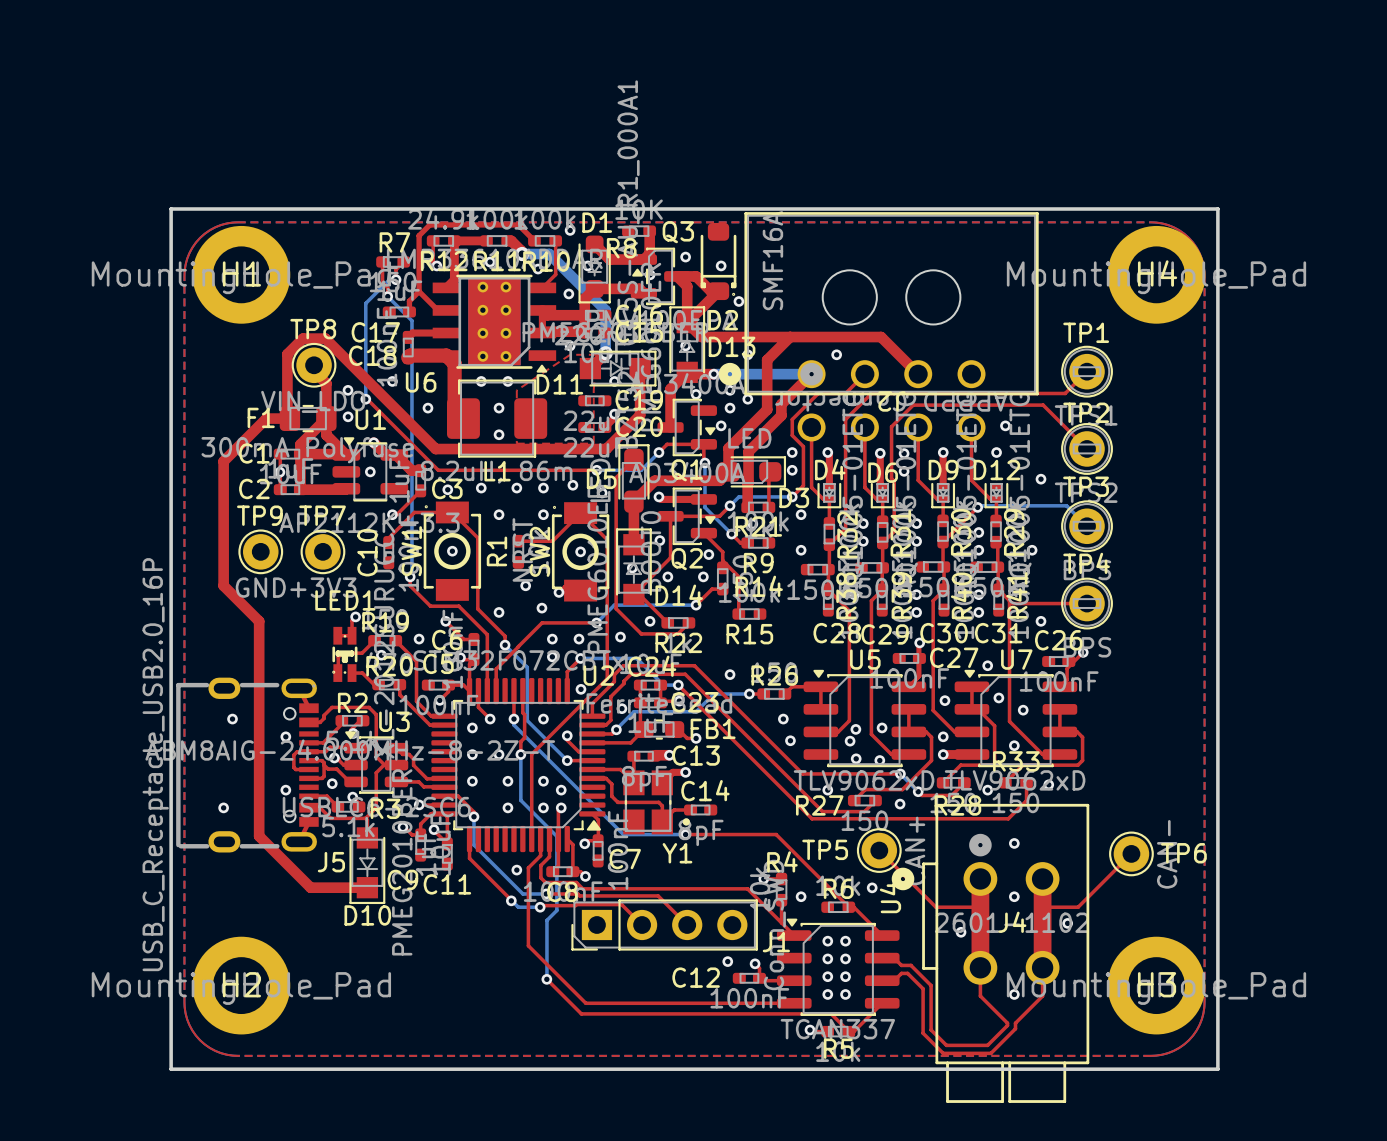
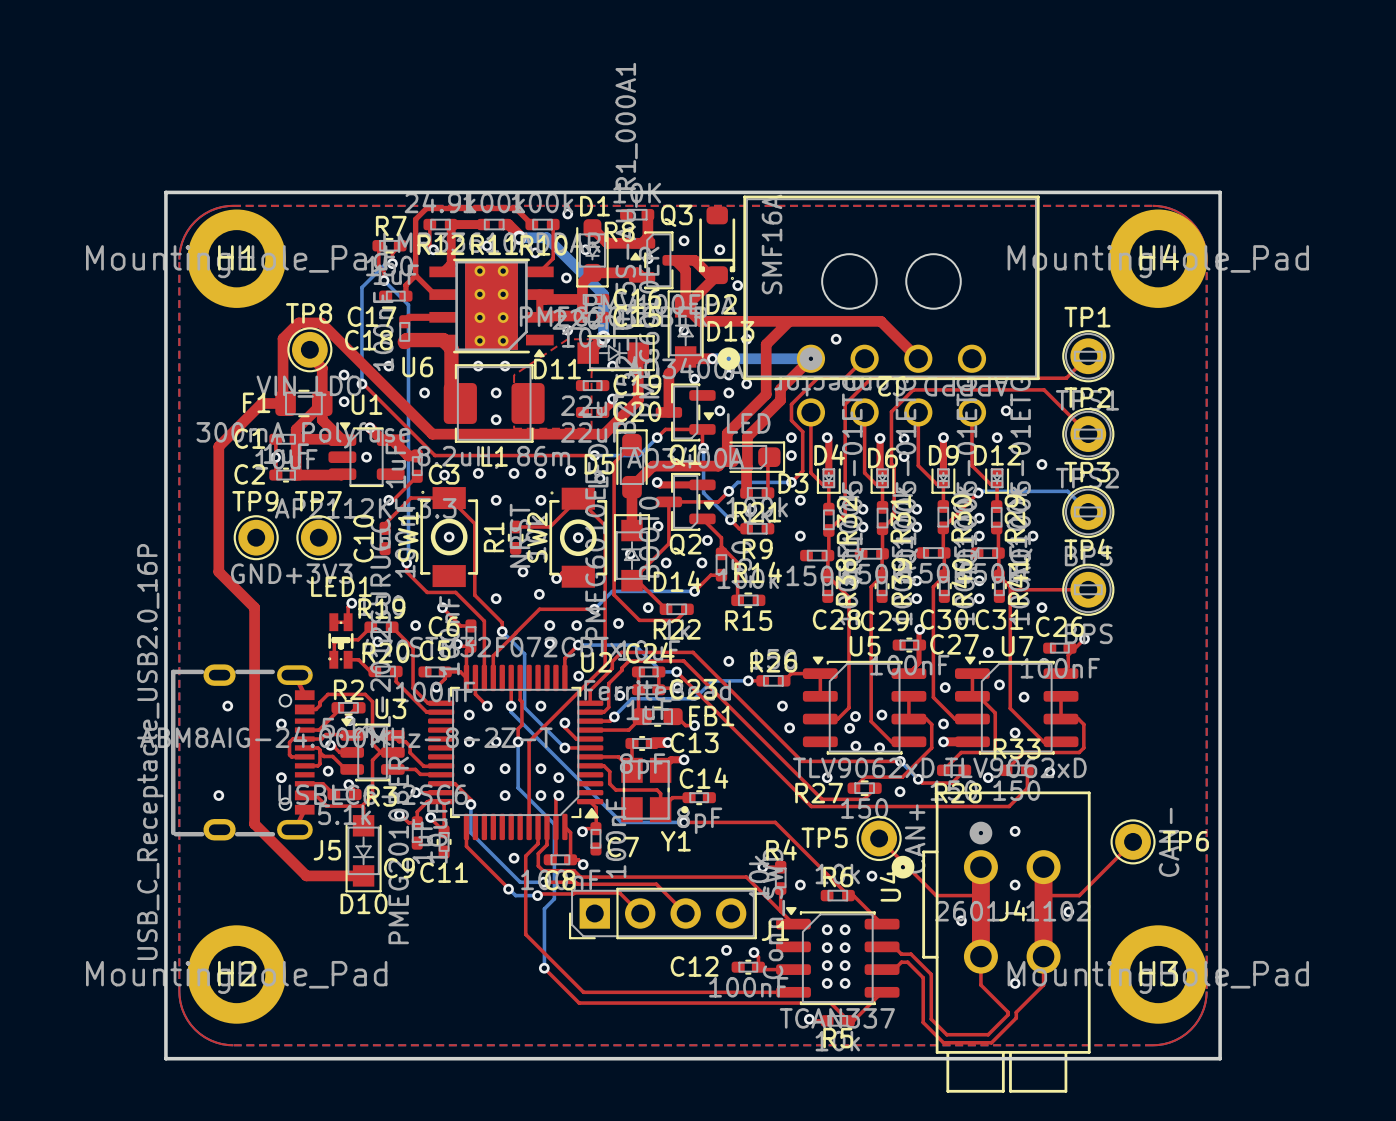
R7 footprint: [376, 256, 411, 268] -> [372, 237, 407, 254]
C2 footprint: [273, 484, 307, 496] -> [269, 467, 303, 483]
R1 footprint: [512, 534, 525, 569] -> [507, 520, 524, 555]
C29 footprint: [876, 583, 888, 617] -> [874, 569, 890, 603]
C30 footprint: [938, 583, 950, 617] -> [936, 569, 952, 603]
C31 footprint: [993, 583, 1005, 617] -> [991, 569, 1007, 603]
R15 footprint: [732, 608, 767, 620] -> [731, 592, 766, 609]
C27 footprint: [892, 652, 926, 664] -> [892, 637, 927, 653]
R2 footprint: [335, 715, 370, 727] -> [331, 699, 366, 716]
C13 footprint: [627, 750, 661, 762] -> [625, 735, 659, 752]
R27 footprint: [847, 794, 882, 807] -> [847, 780, 882, 797]
C14 footprint: [684, 804, 718, 816] -> [682, 790, 716, 806]
C11 footprint: [441, 837, 453, 871] -> [436, 825, 452, 859]
C12 footprint: [732, 972, 767, 984] -> [731, 959, 766, 975]

